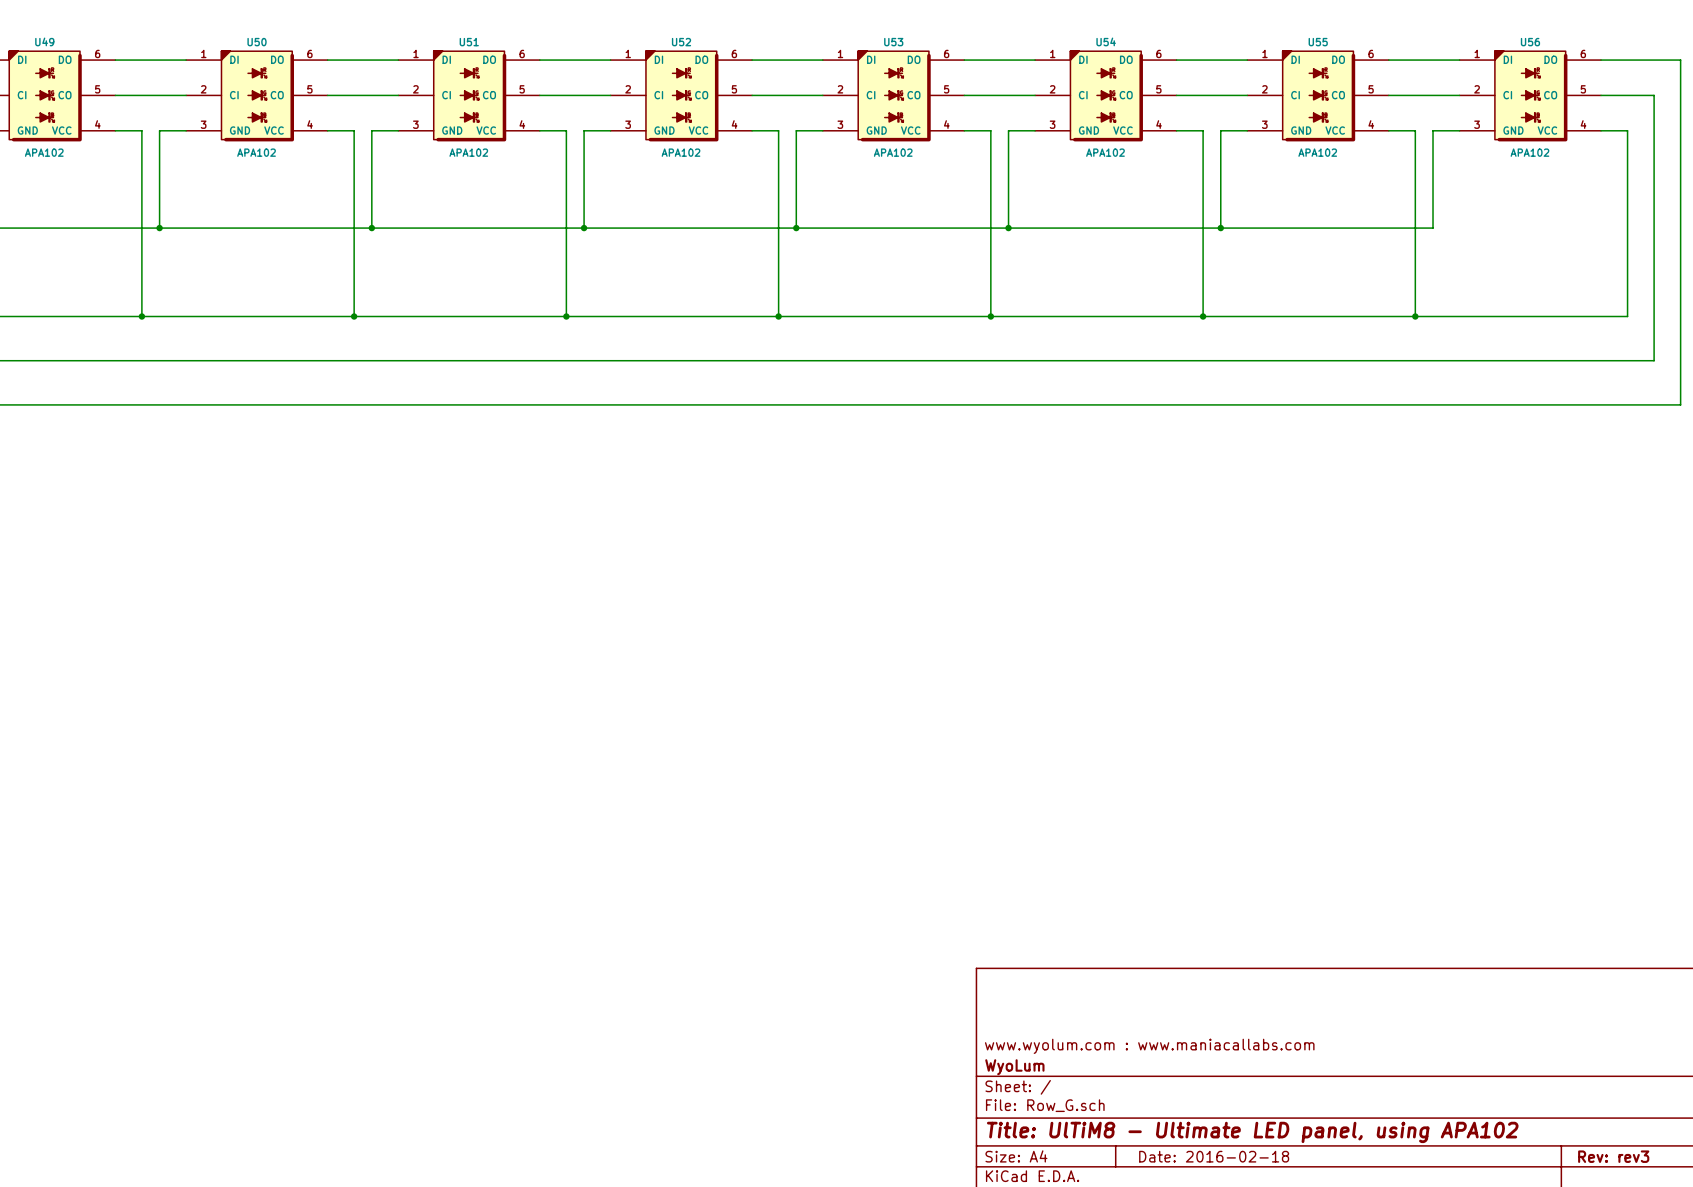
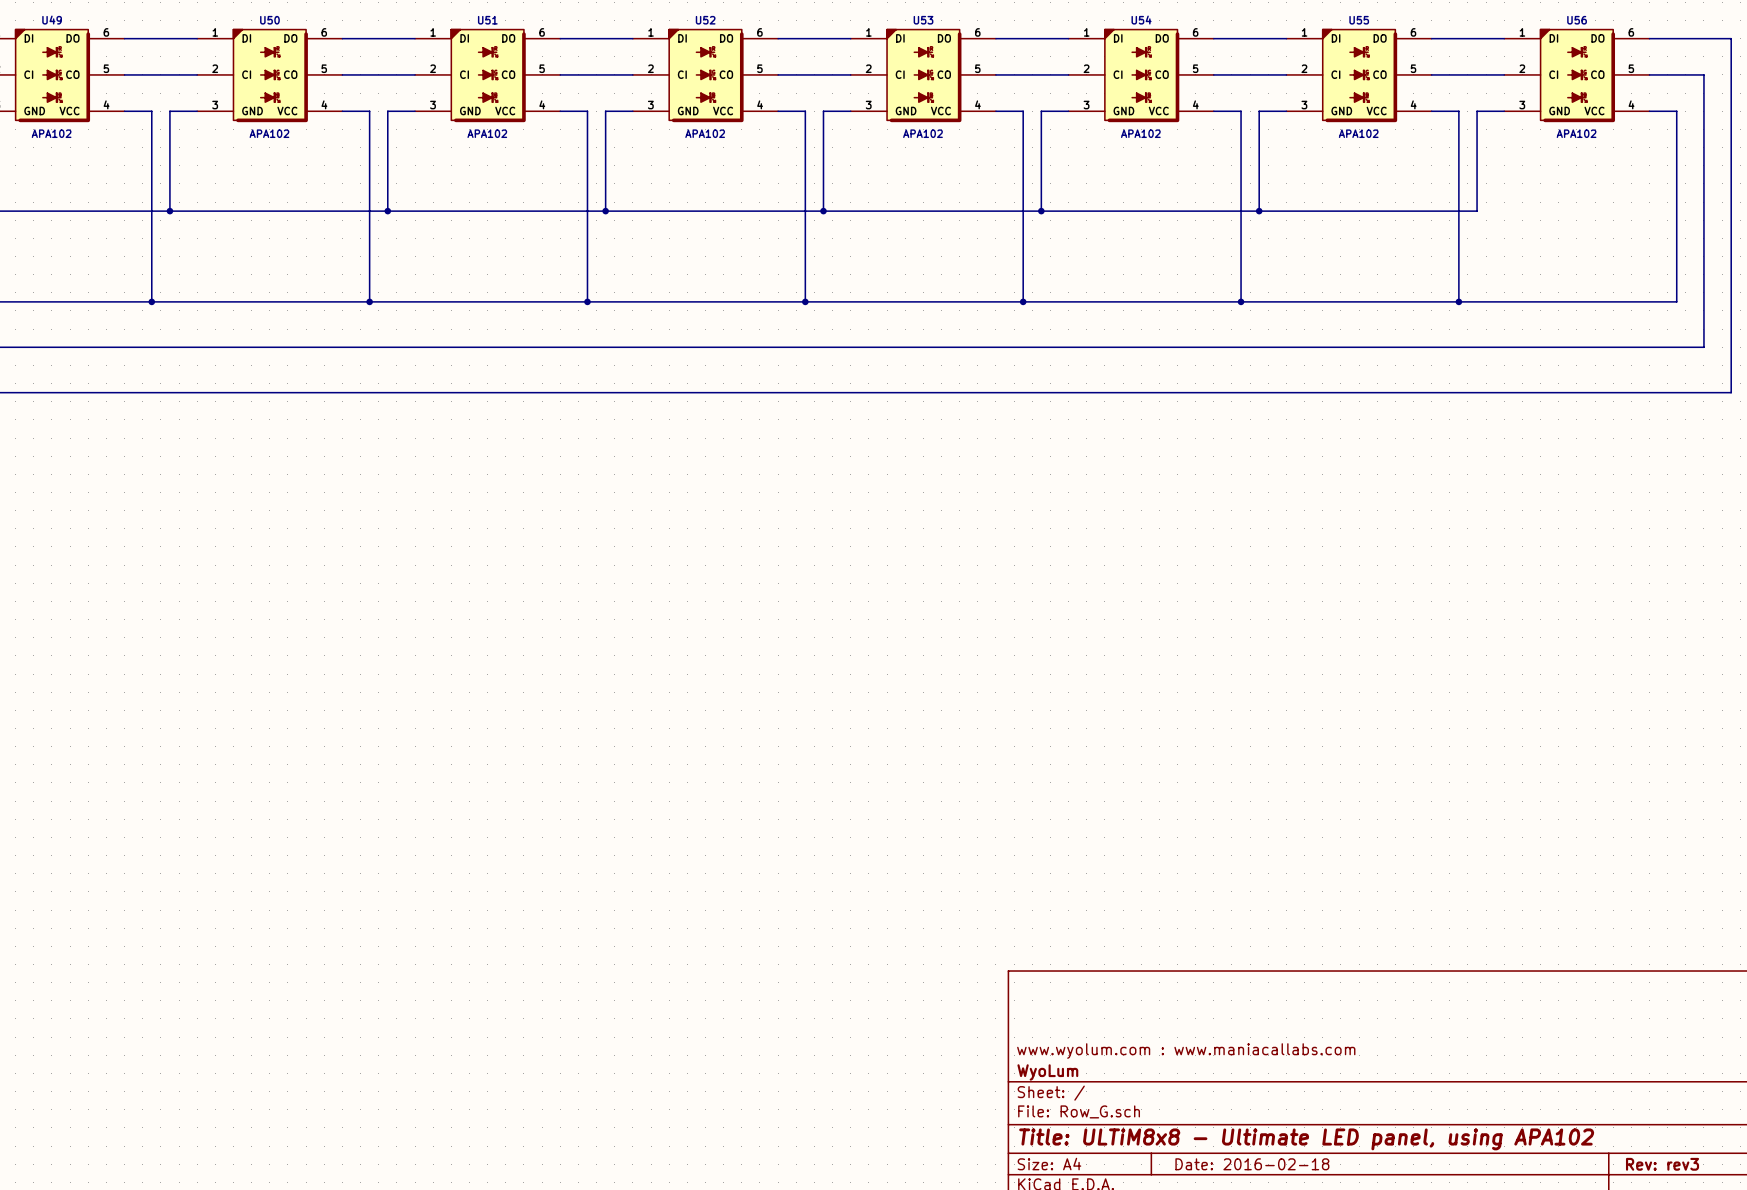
title block: Title: UlTiM8 - Ultimate LED panel, using APA102 (1252, 1132) -> Title: ULTiM8x8 - Ultimate LED panel, using APA102 (1306, 1139)

